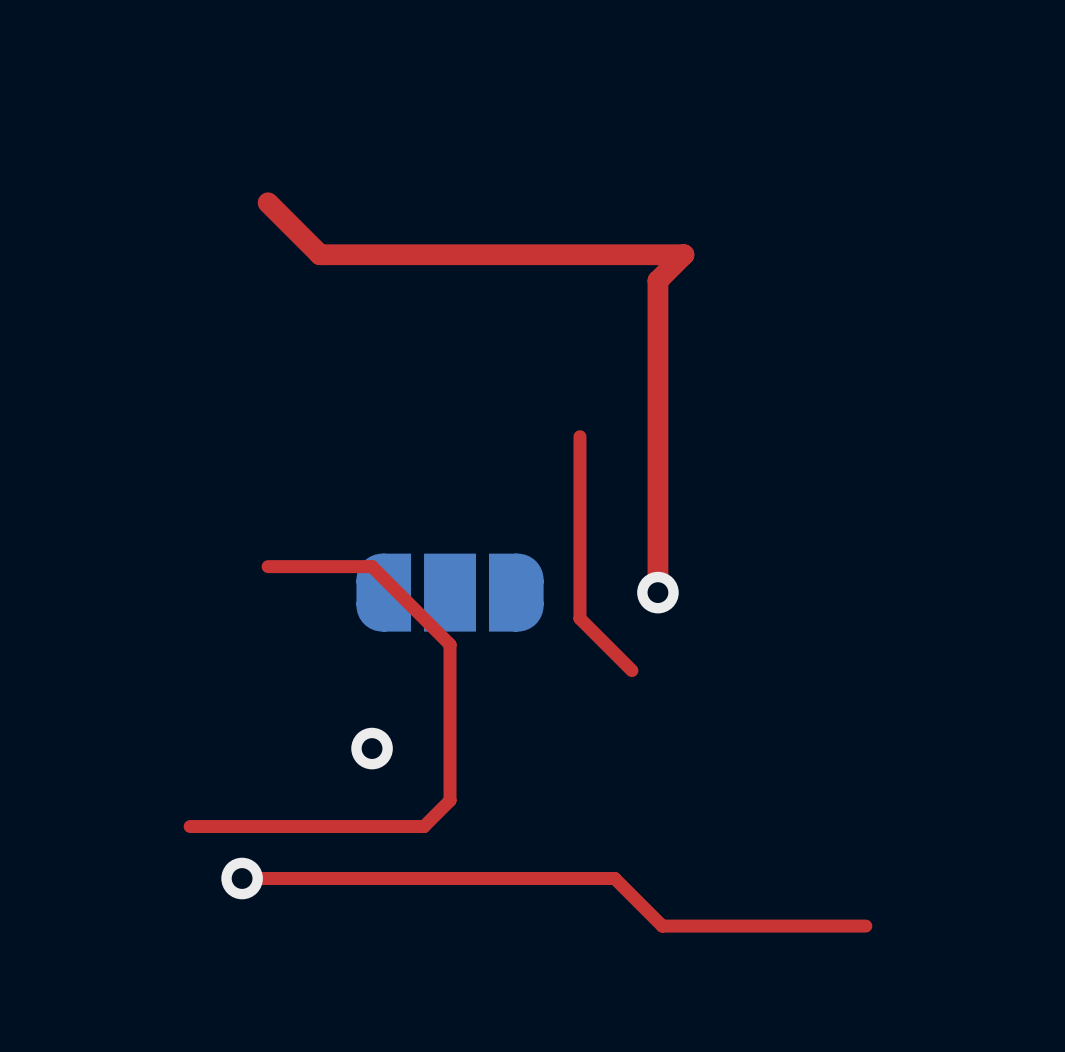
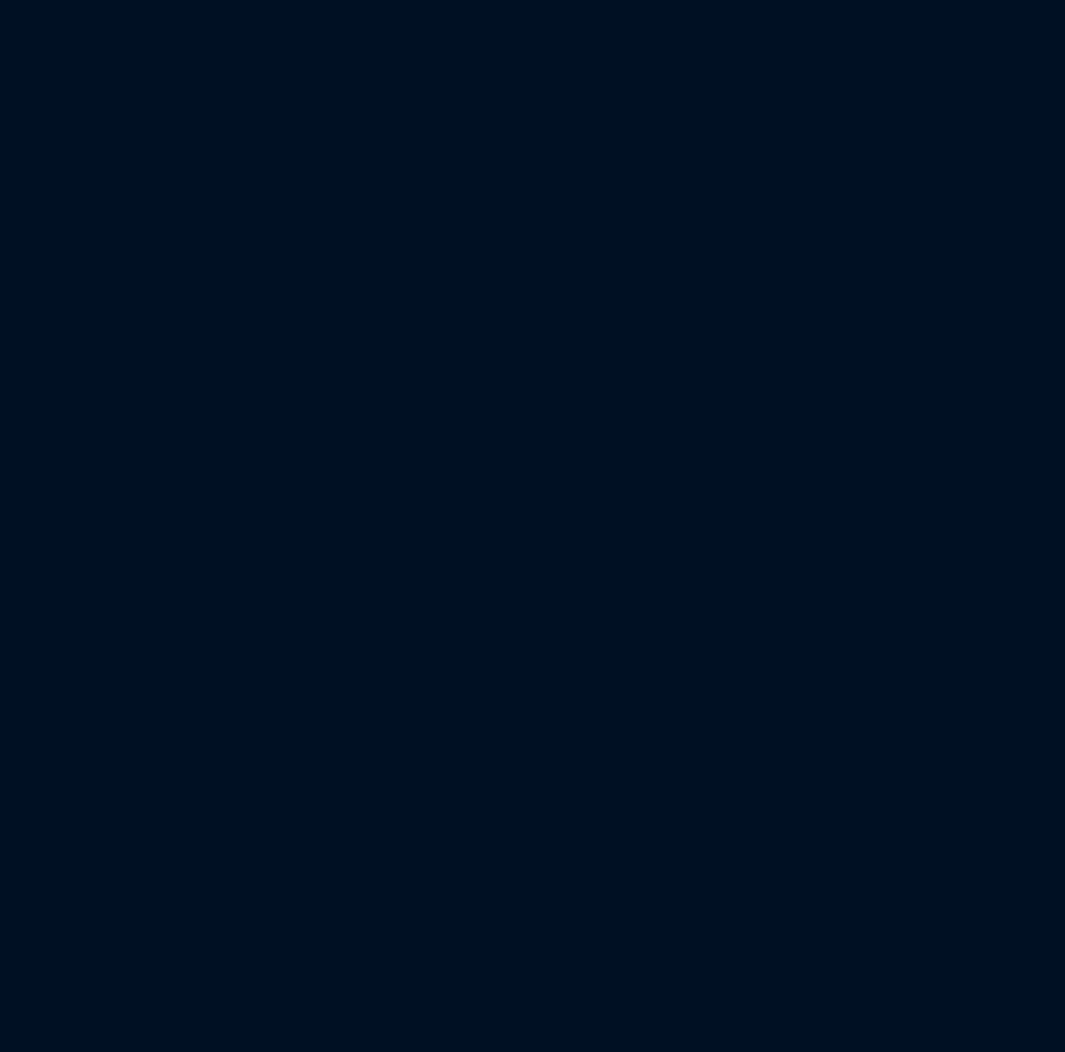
top track: (268, 202) (320, 254) (683, 254) (657, 280) (657, 592) -> none
top track: (579, 436) (579, 618) (631, 670) -> none
top track: (268, 566) (372, 566) (450, 644) (450, 800) (424, 826) (190, 826) -> none
part: (450, 592) -> none
via: (657, 592) -> none
via: (372, 748) -> none
top track: (242, 878) (614, 878) (662, 926) (865, 926) -> none
via: (242, 878) -> none

